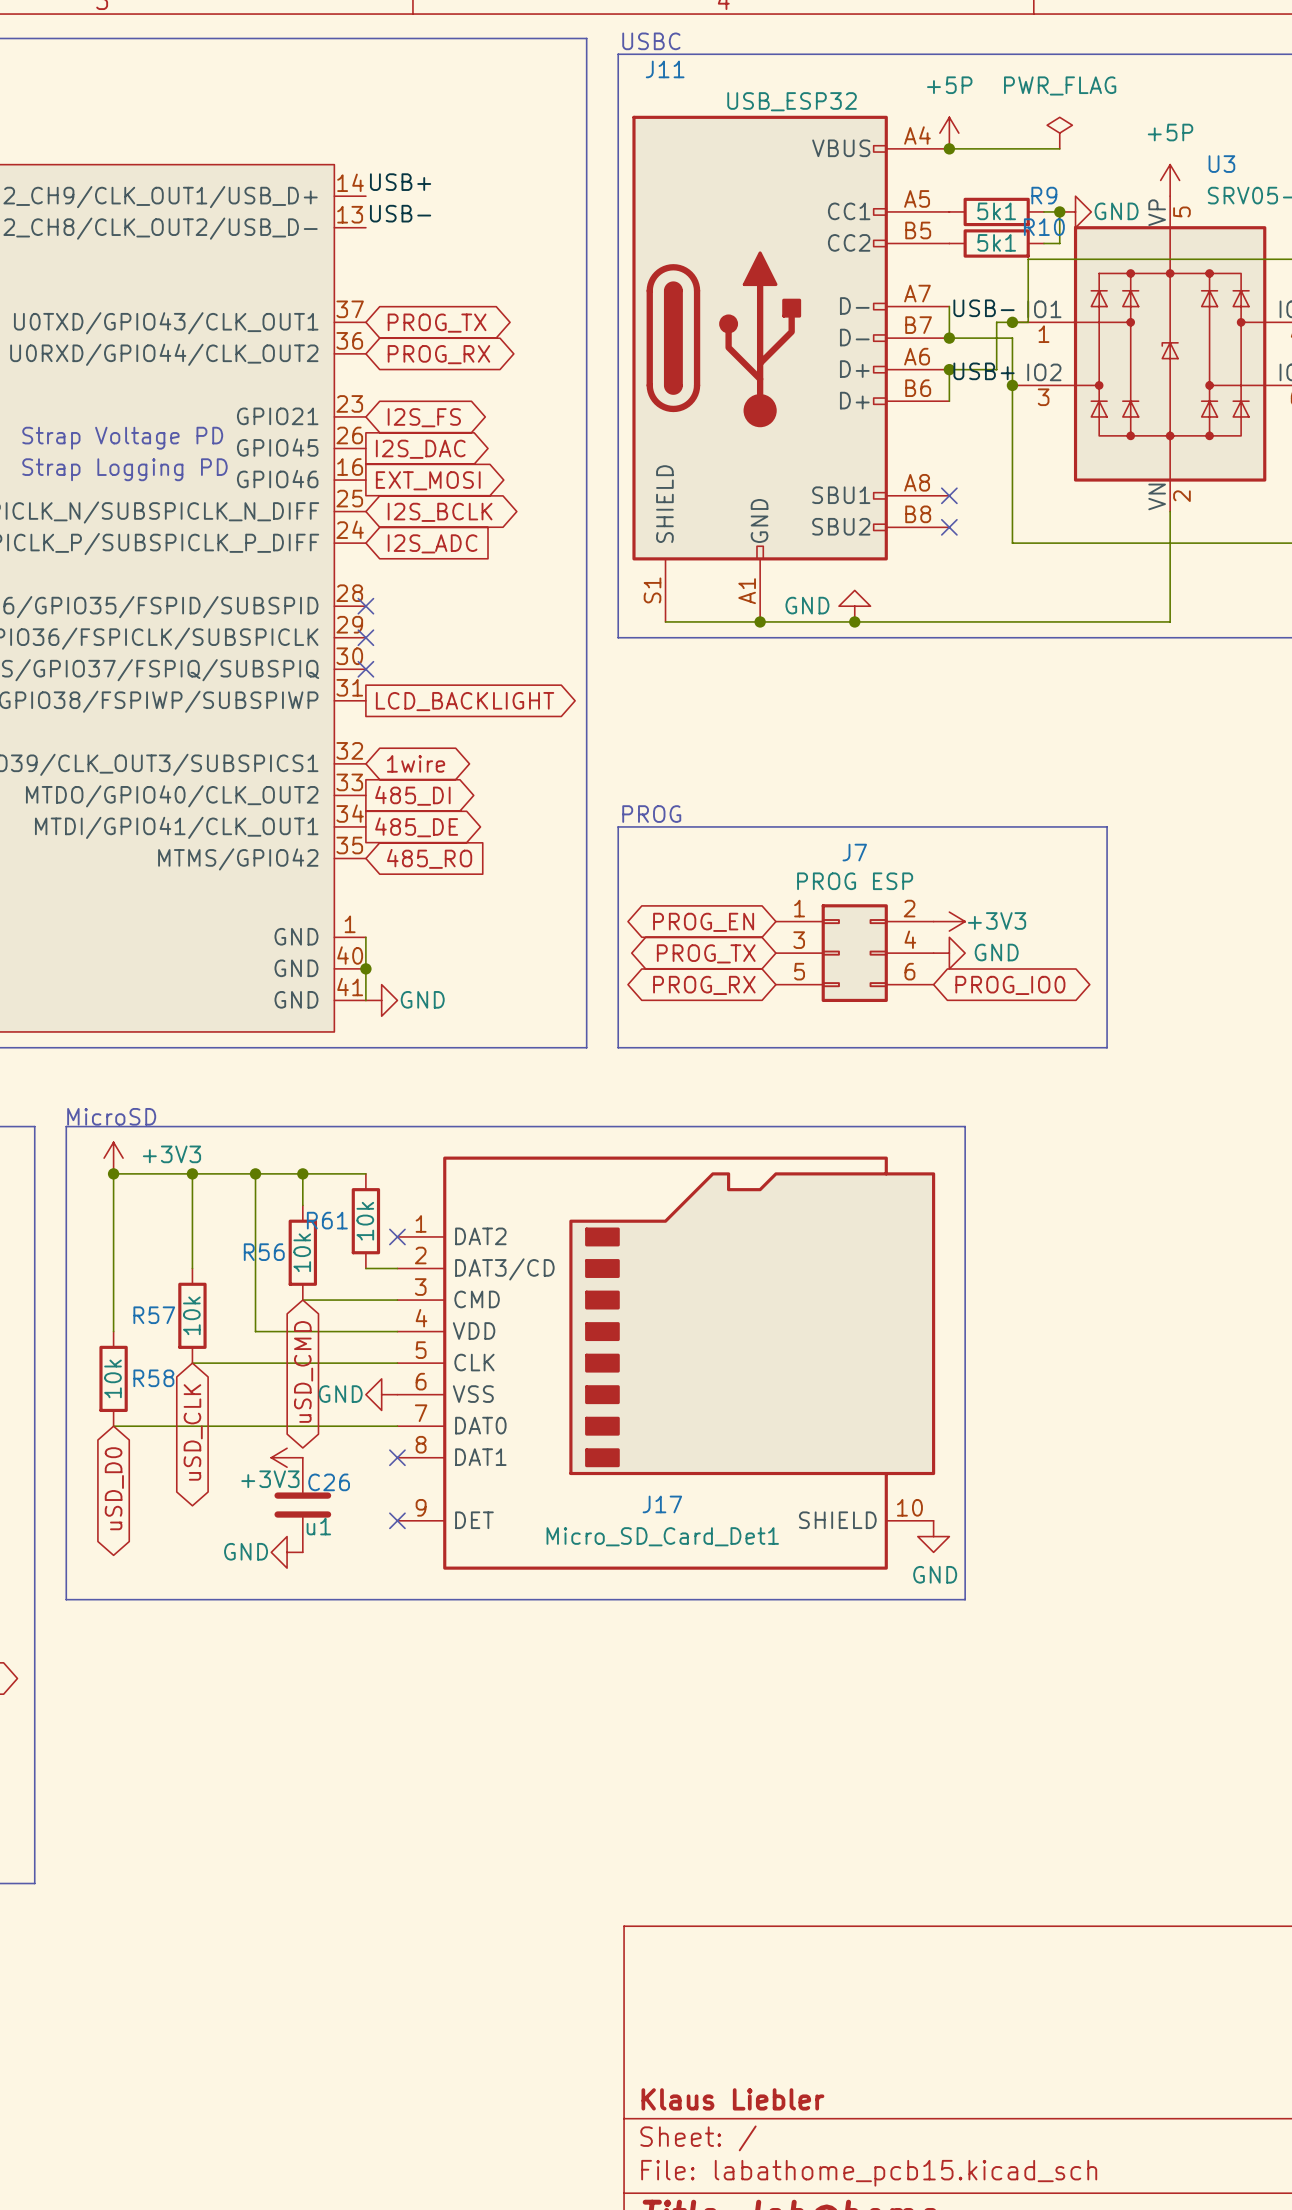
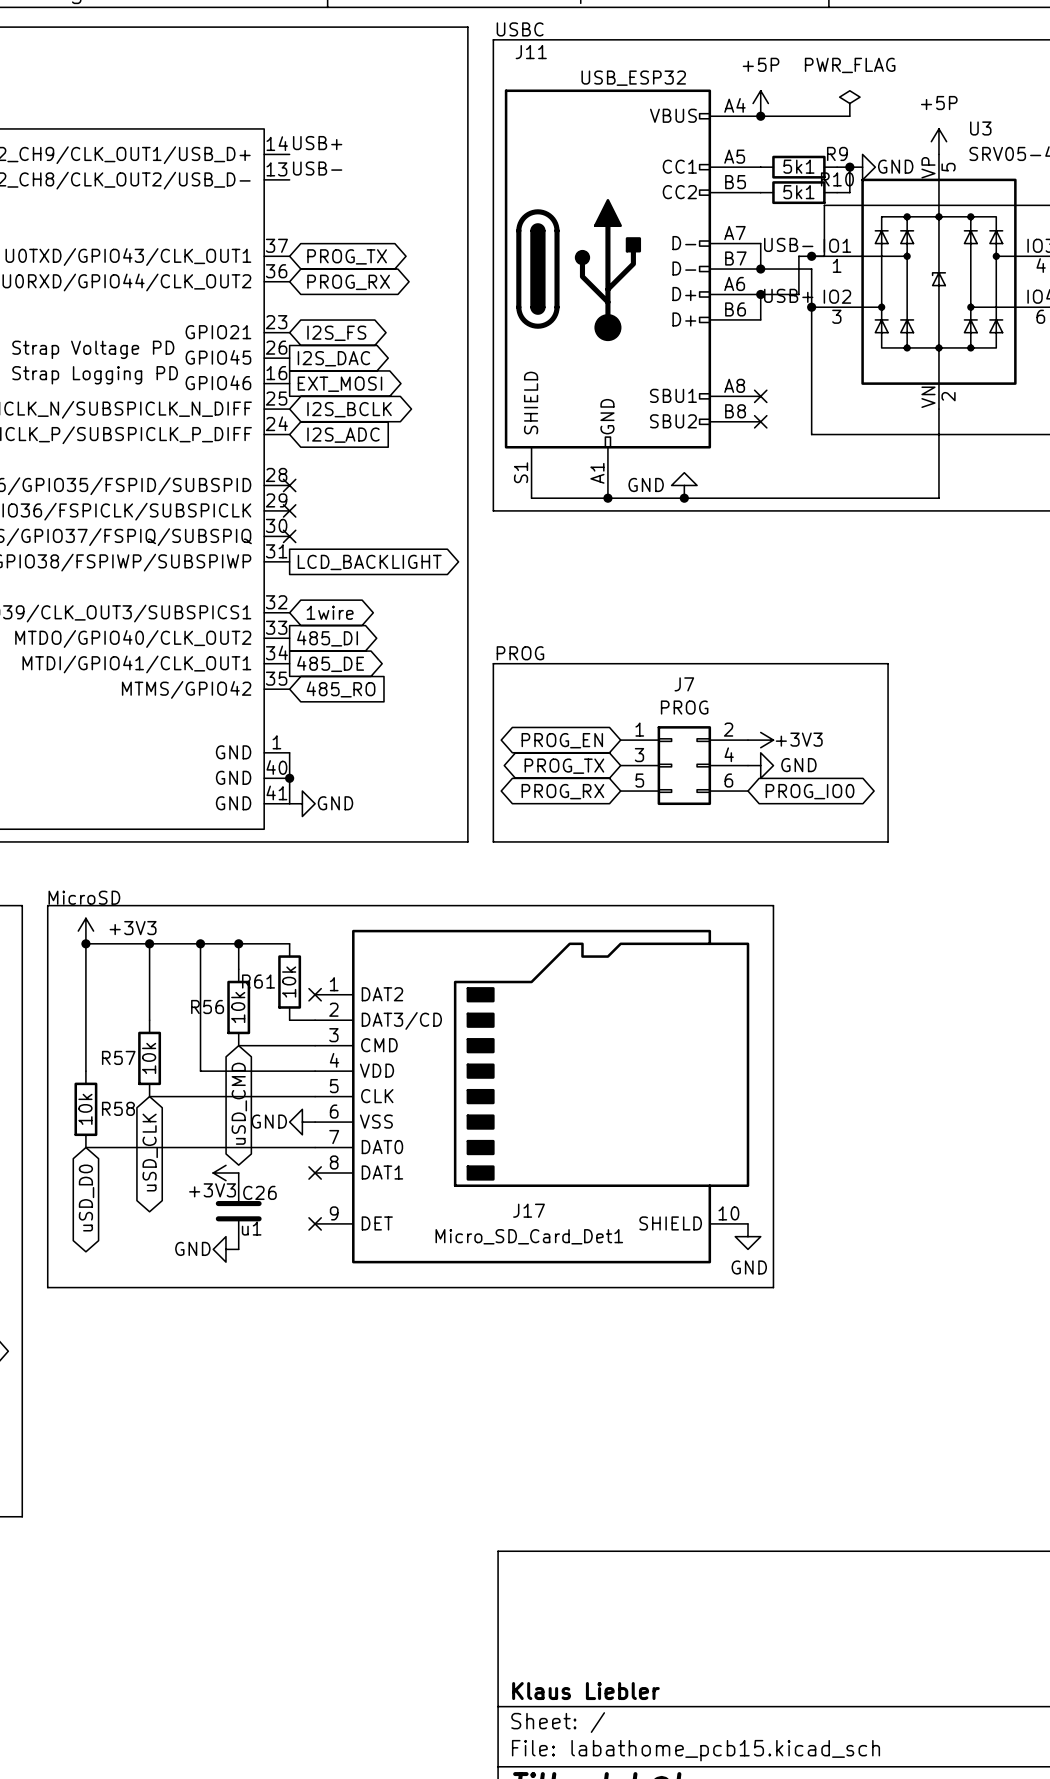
J7 value: PROG ESP (855, 881) -> PROG (684, 707)

